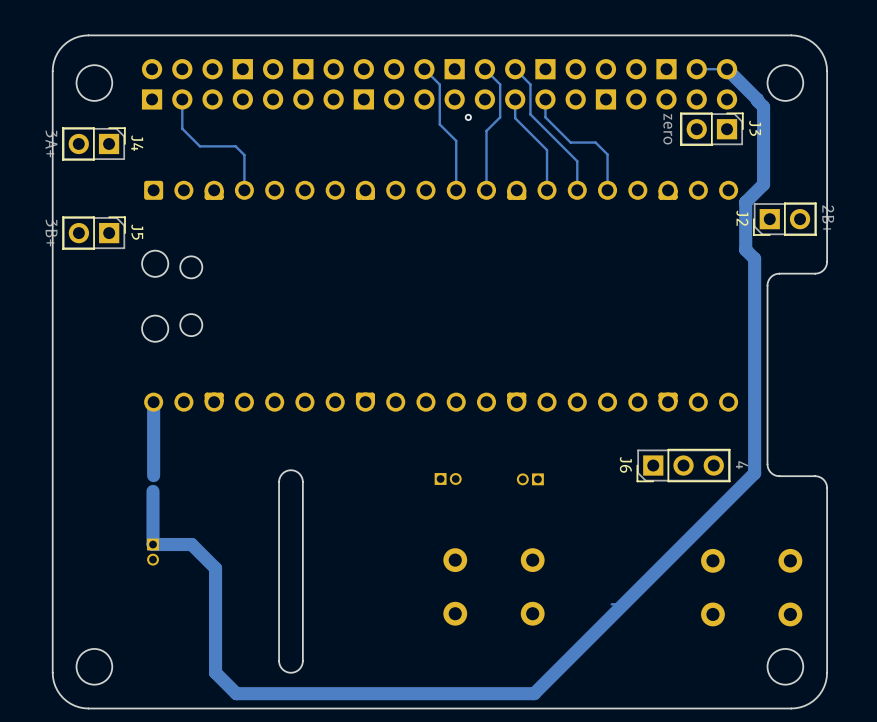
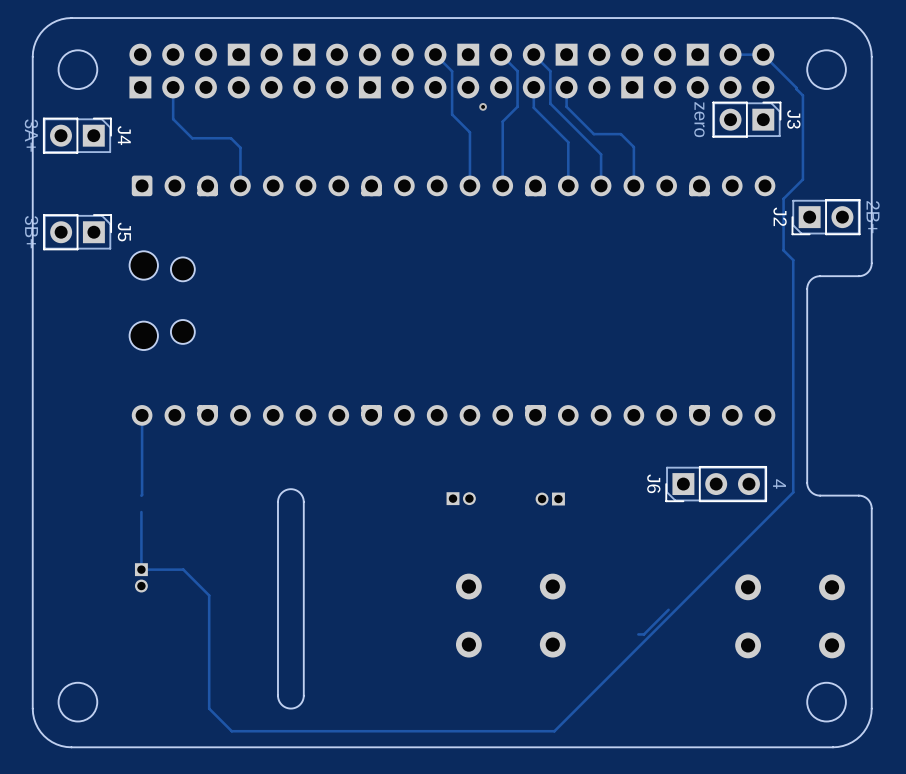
track width: thick (727, 69) (763, 106) (763, 184) (745, 202) (745, 249) (754, 258) (754, 473) (534, 693) (236, 693) (215, 672) (215, 568) (191, 544) (153, 544) (153, 491) -> thin (763, 54) (802, 95) (802, 179) (783, 198) (783, 250) (793, 260) (793, 492) (554, 731) (231, 731) (209, 708) (209, 595) (183, 569) (141, 569) (141, 512)
track width: thick (153, 402) (153, 475) -> thin (142, 415) (142, 495)

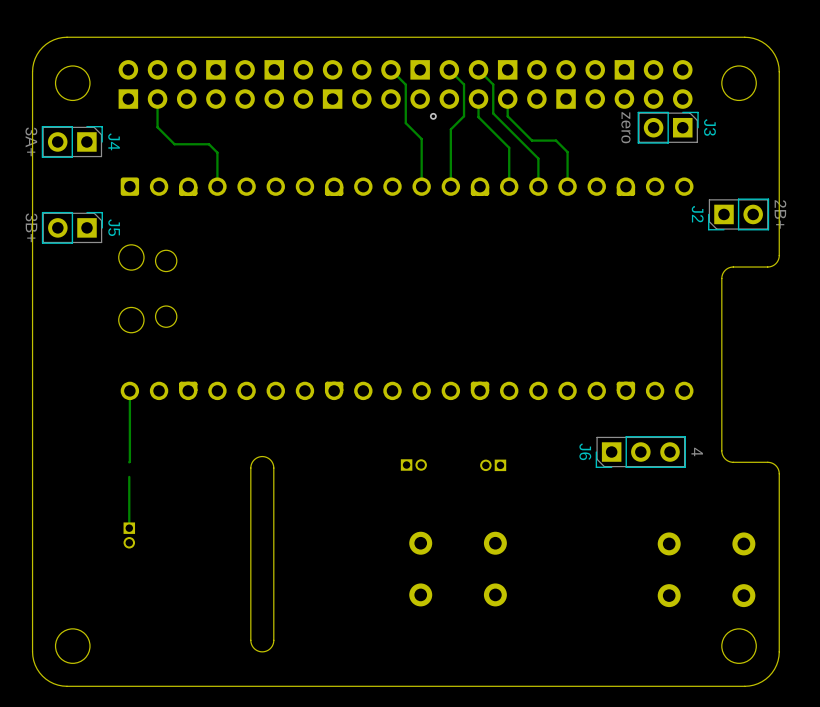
track: (730, 54) (763, 54) (802, 95) (802, 179) (783, 198) (783, 250) (793, 260) (793, 492) (554, 731) (231, 731) (209, 708) (209, 595) (183, 569) (141, 569) -> none
track: (668, 609) (643, 634) (638, 634) -> none

